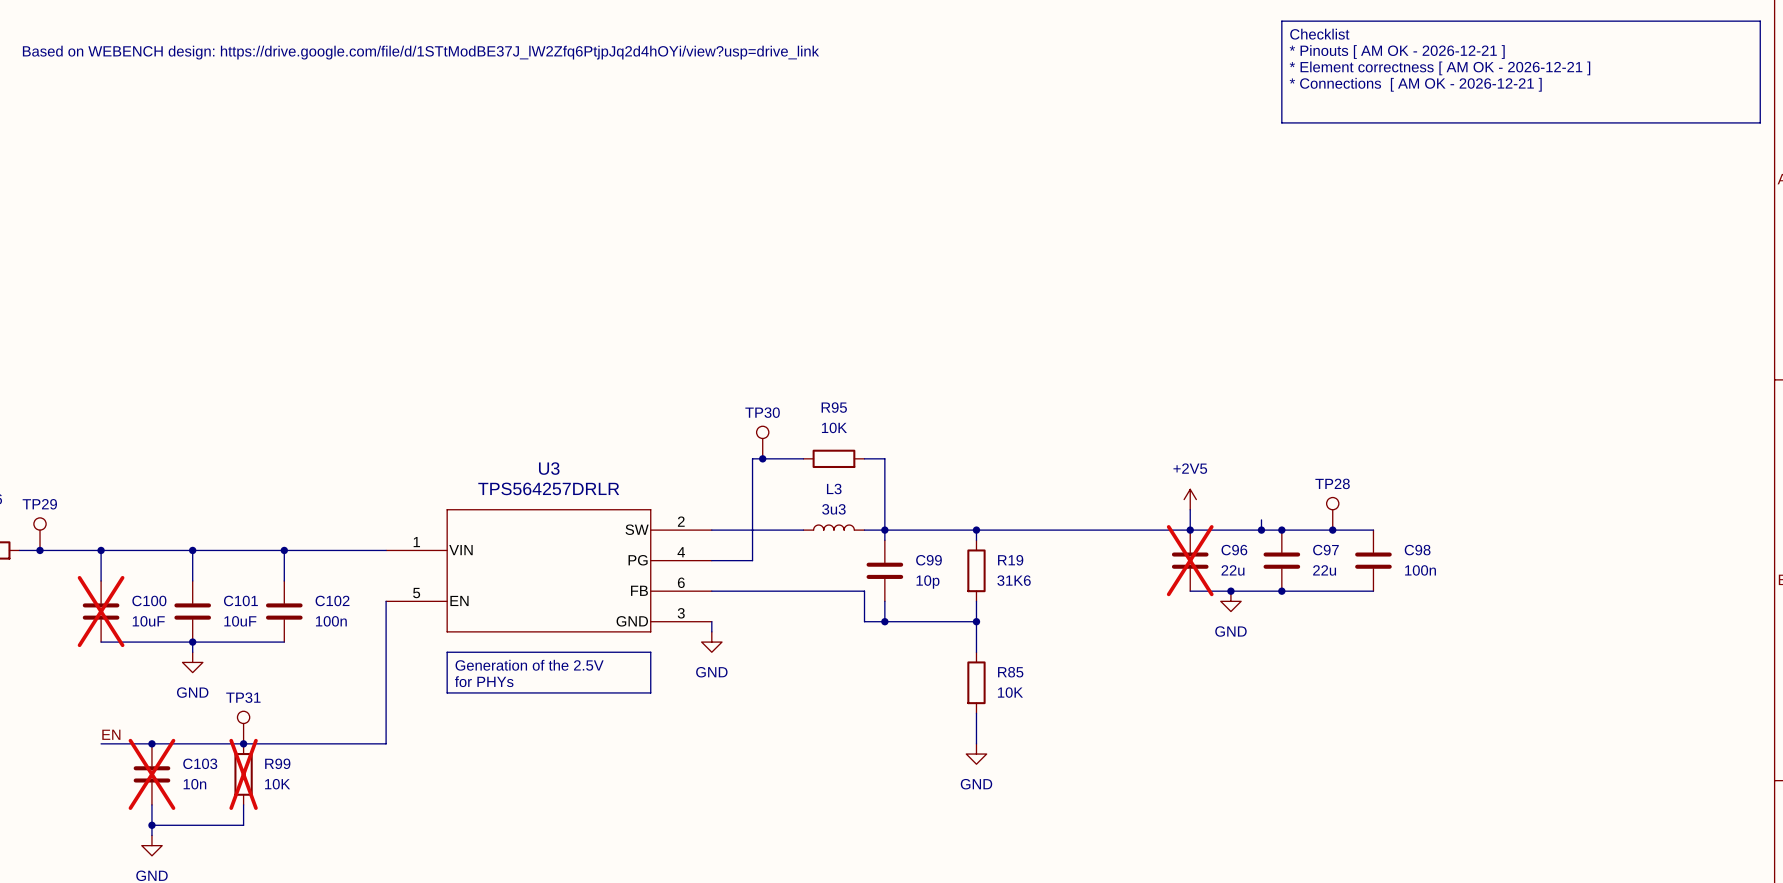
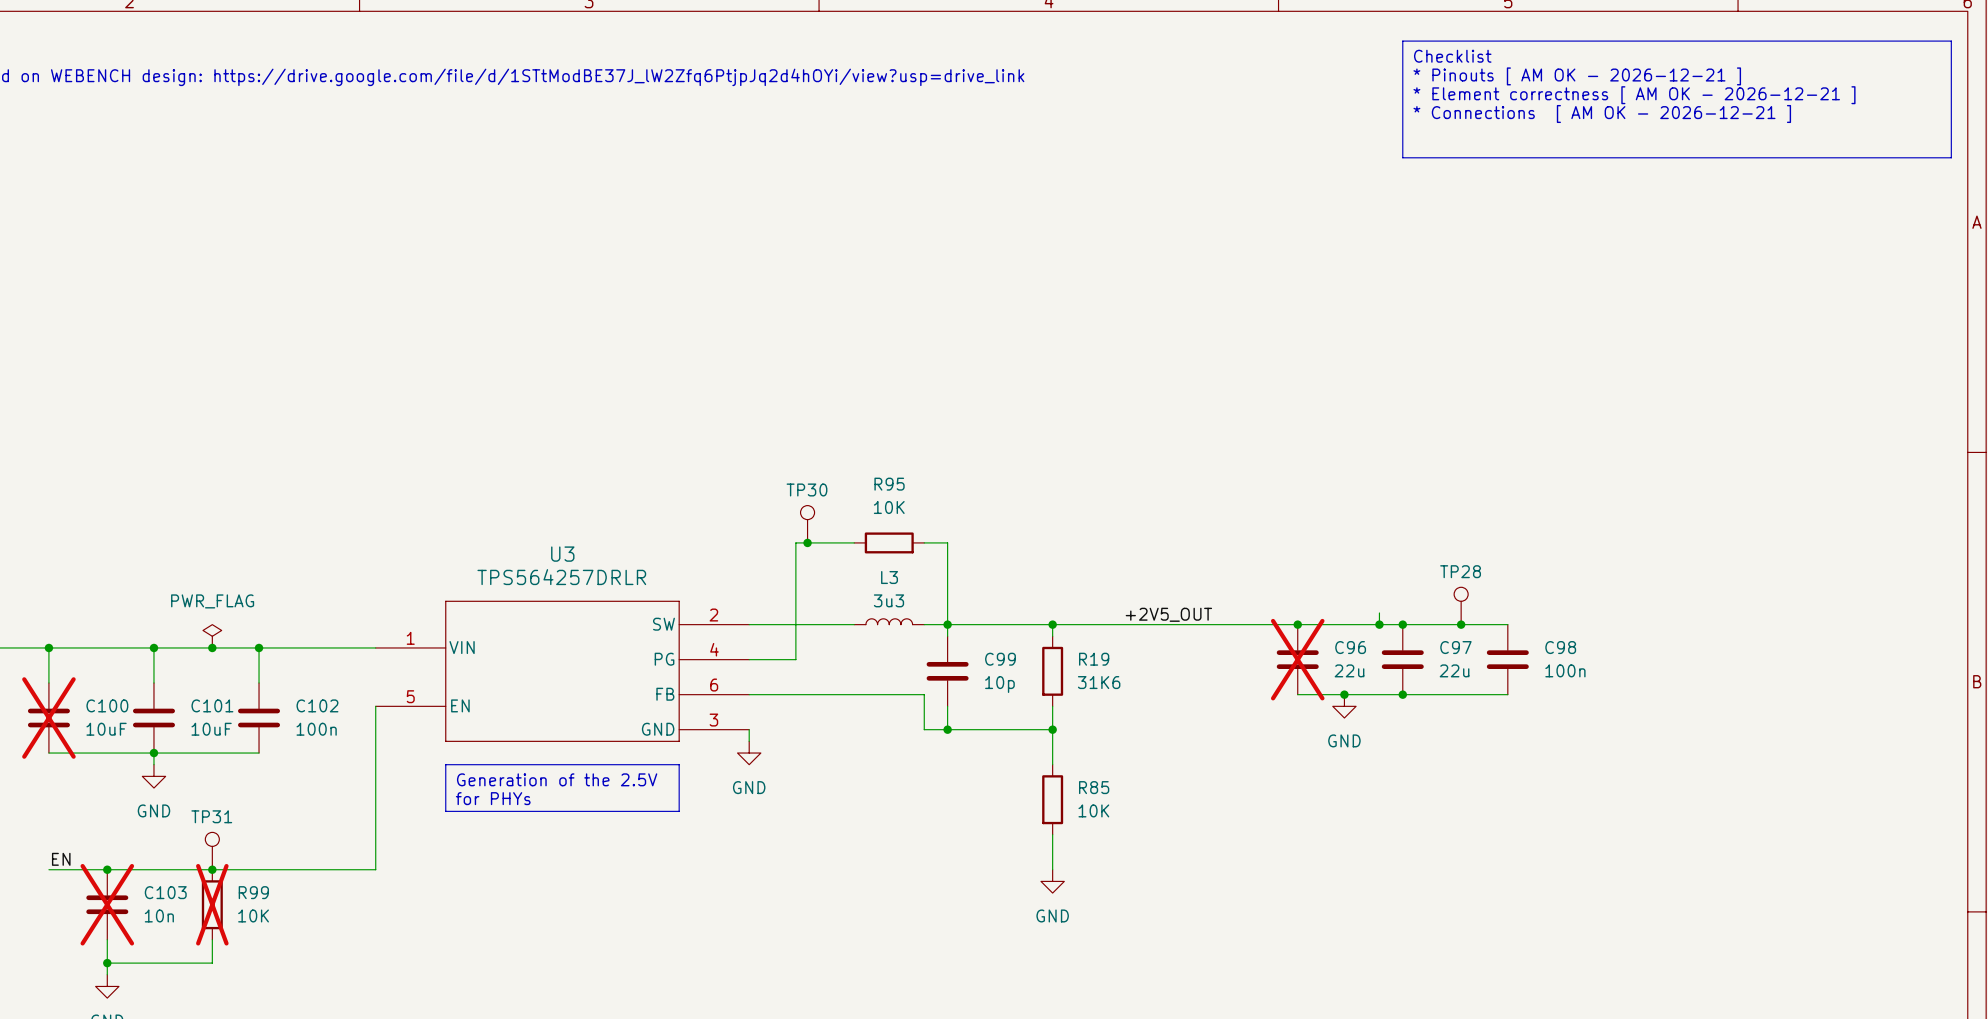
power symbol: +2V5 (1190, 499) -> none
wire: (1190, 509) (1190, 530) -> none
label: none -> +2V5_OUT (1168, 614)
power symbol: none -> PWR_FLAG (212, 636)
junction: none -> (212, 647)

